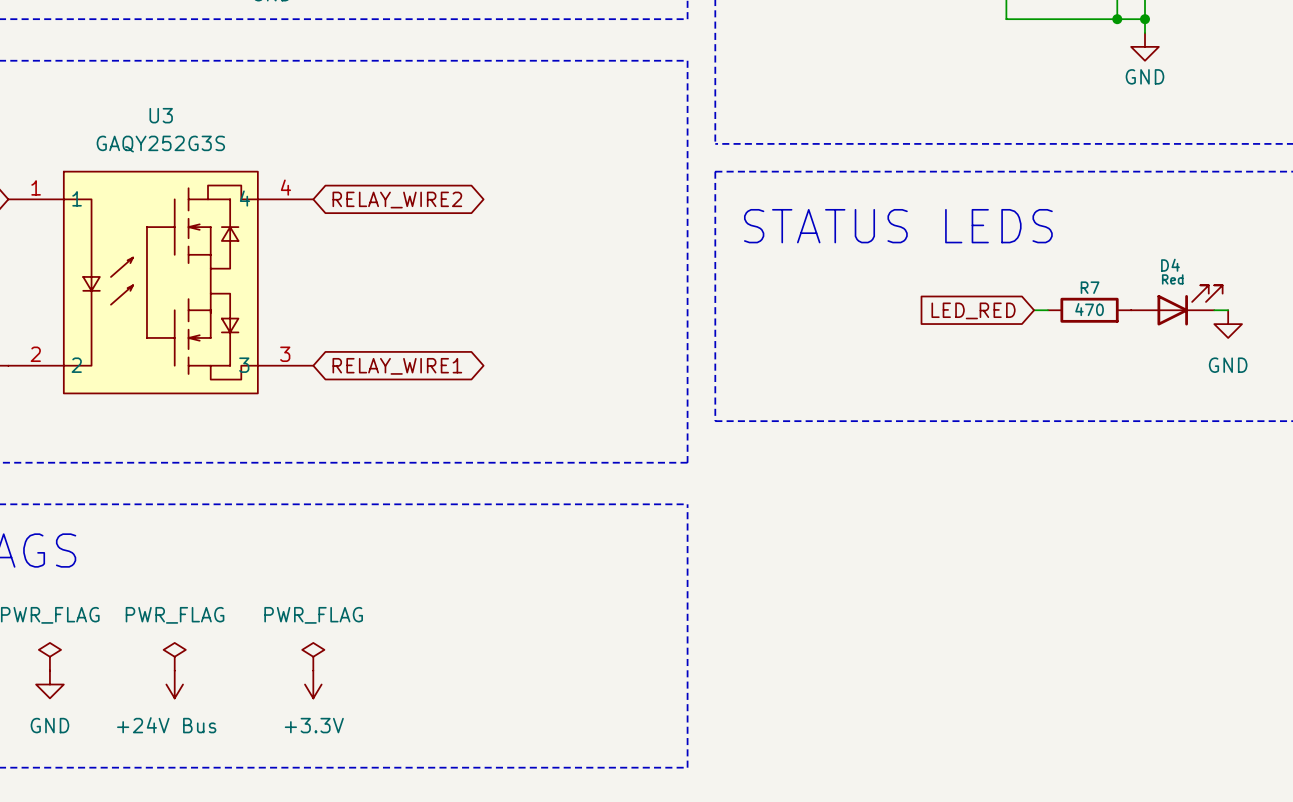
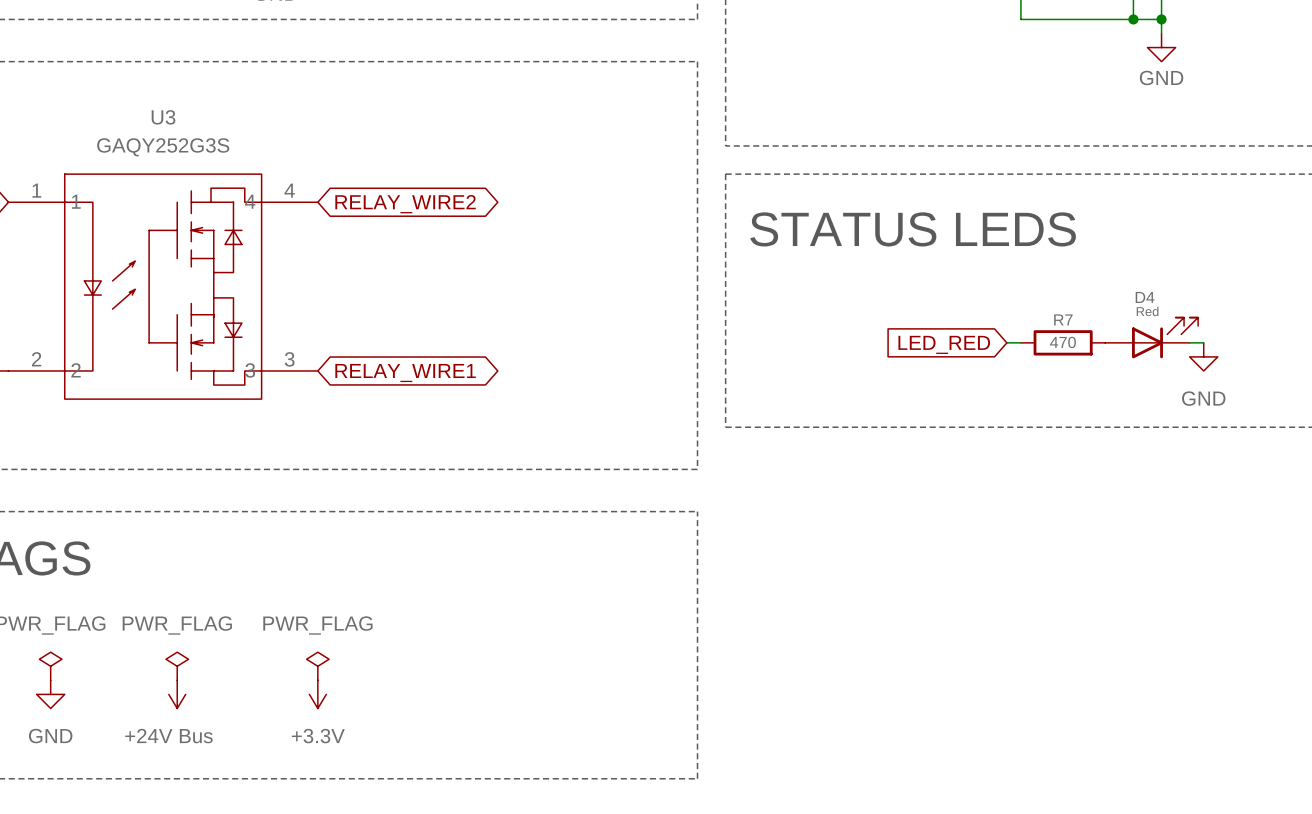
D4 position: (1176, 305) -> (1151, 337)
global label position: LED_RED (973, 310) -> LED_RED (944, 344)
wire: (1034, 310) (1047, 310) -> (1006, 342) (1020, 342)
R7 position: (1089, 310) -> (1063, 342)
wire: (1214, 310) (1228, 310) -> (1189, 342) (1203, 342)
power symbol position: GND (1228, 324) -> GND (1203, 356)

